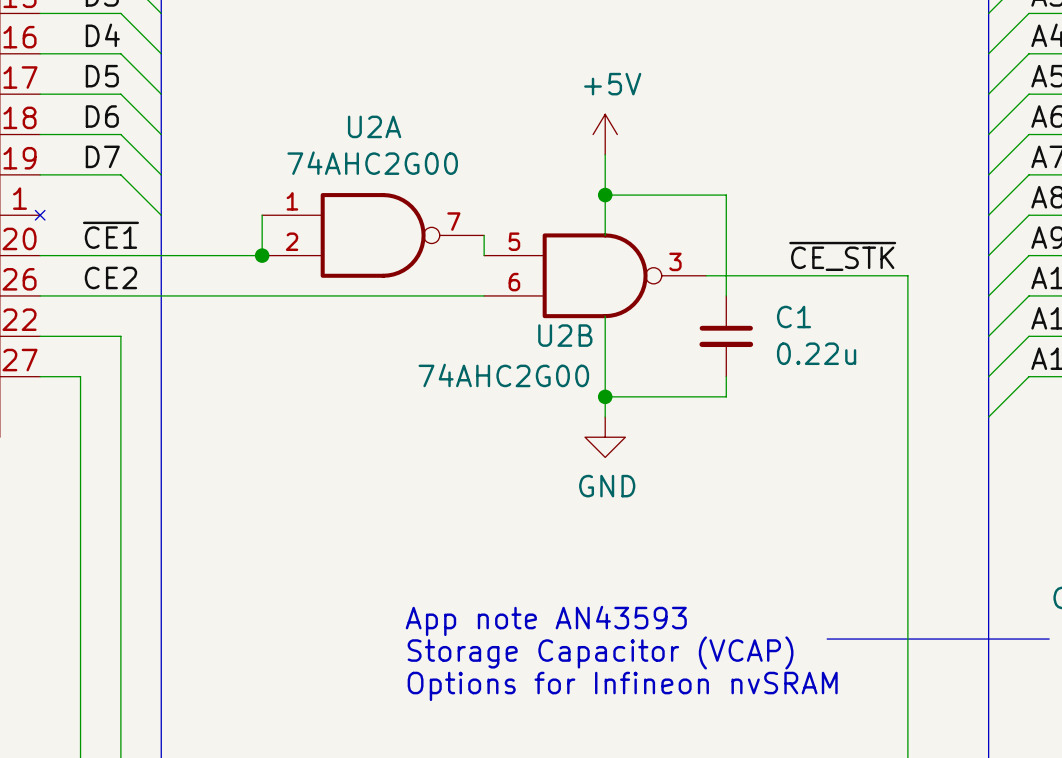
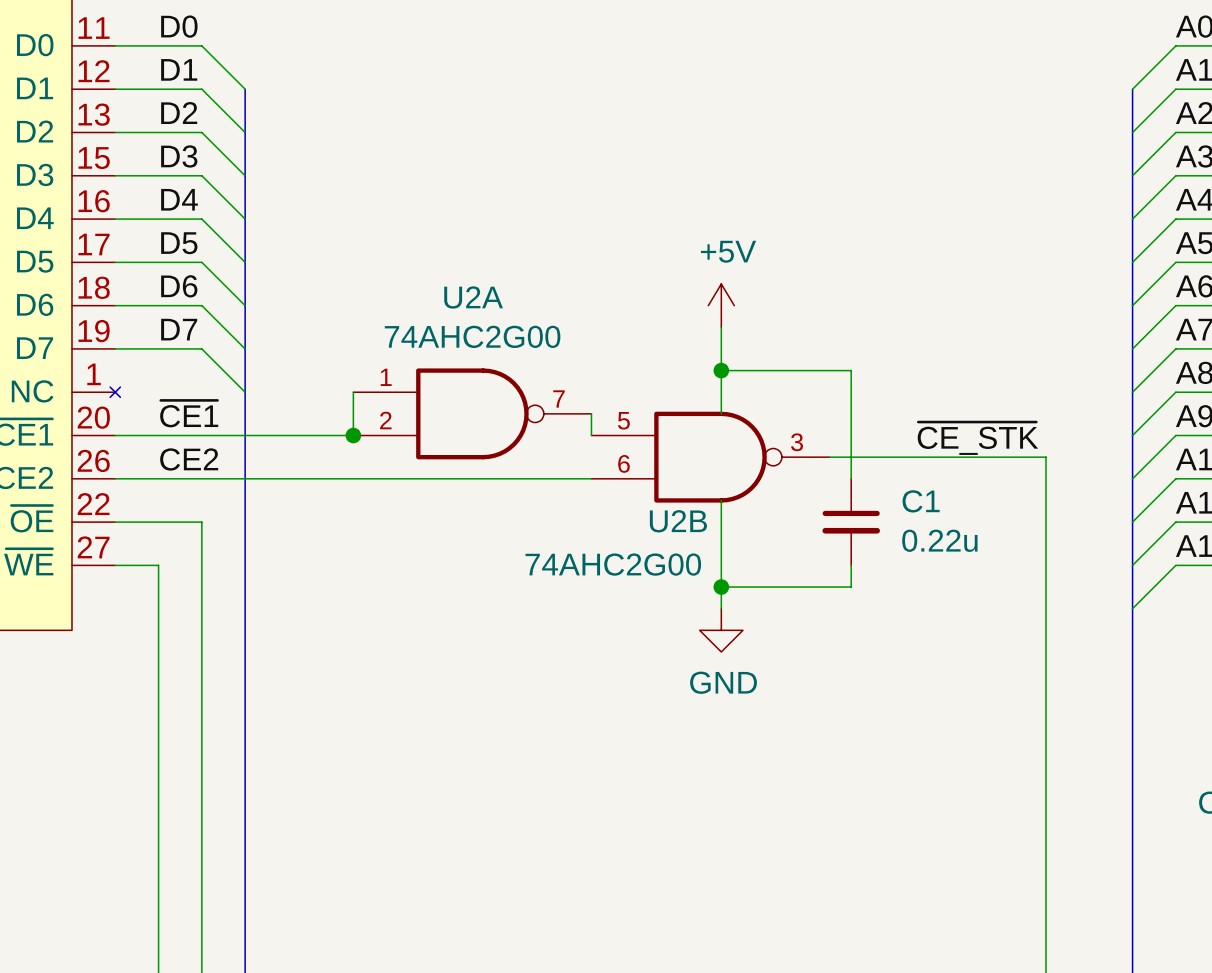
text: App note AN43593 (546, 620) -> none
line: (827, 639) (1049, 639) -> none
text: Storage Capacitor (VCAP) (600, 652) -> none
text: Options for Infineon nvSRAM (622, 686) -> none

